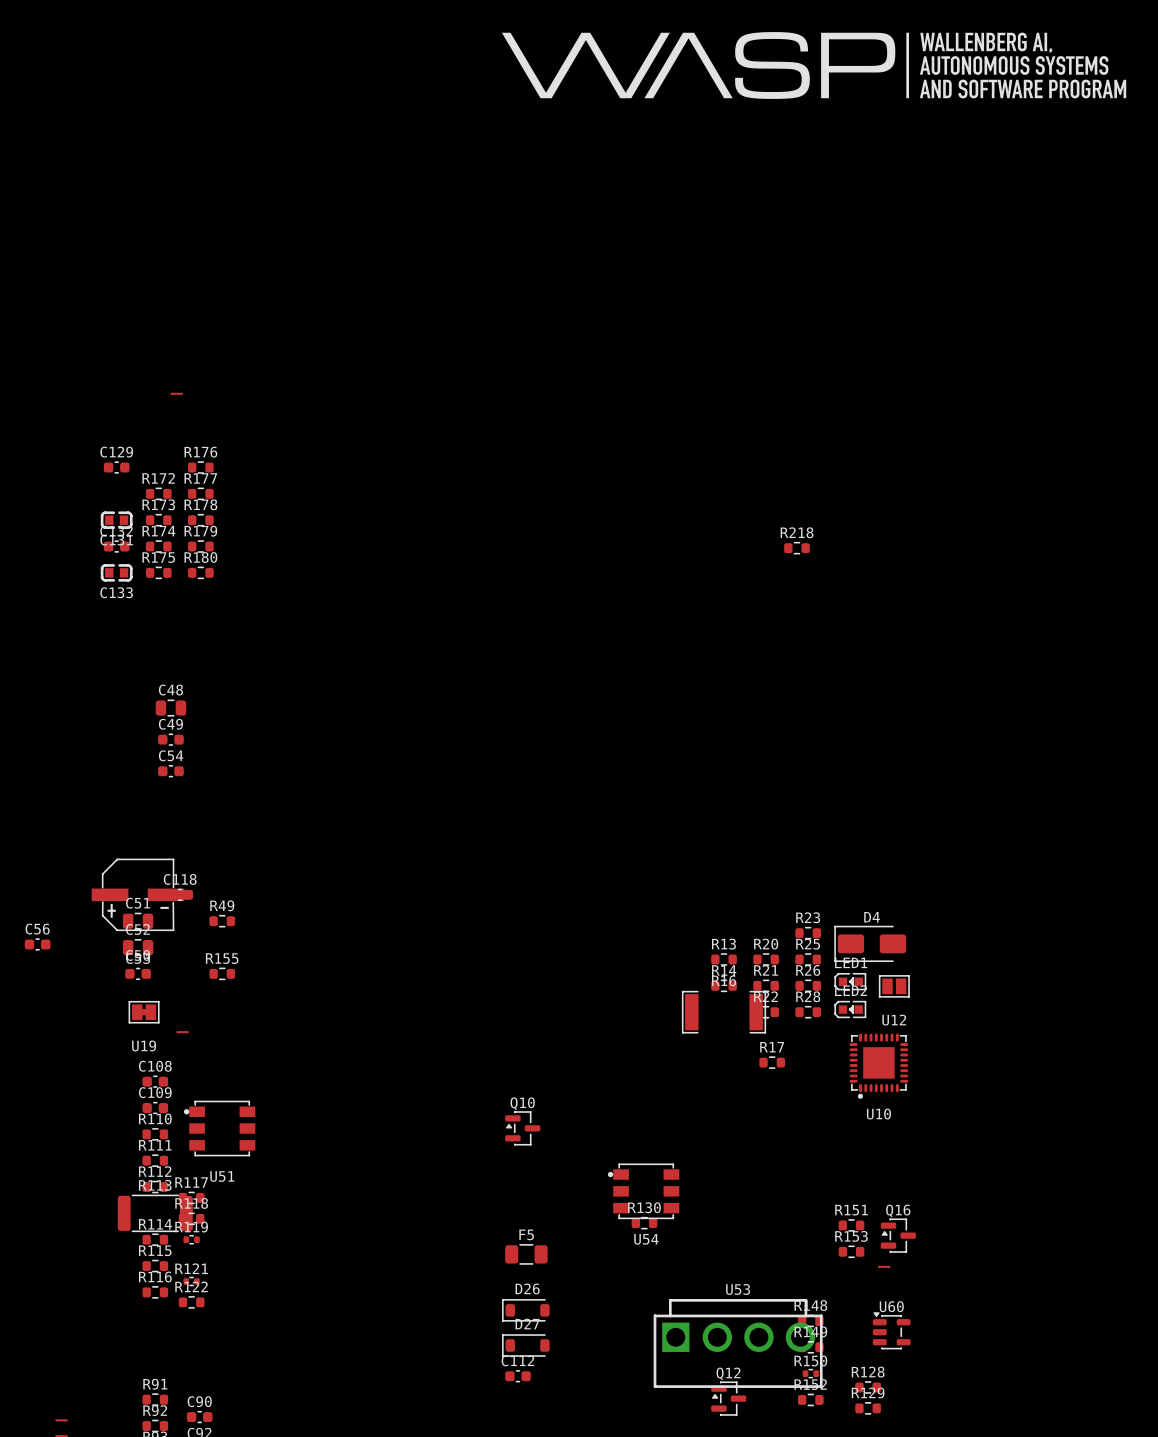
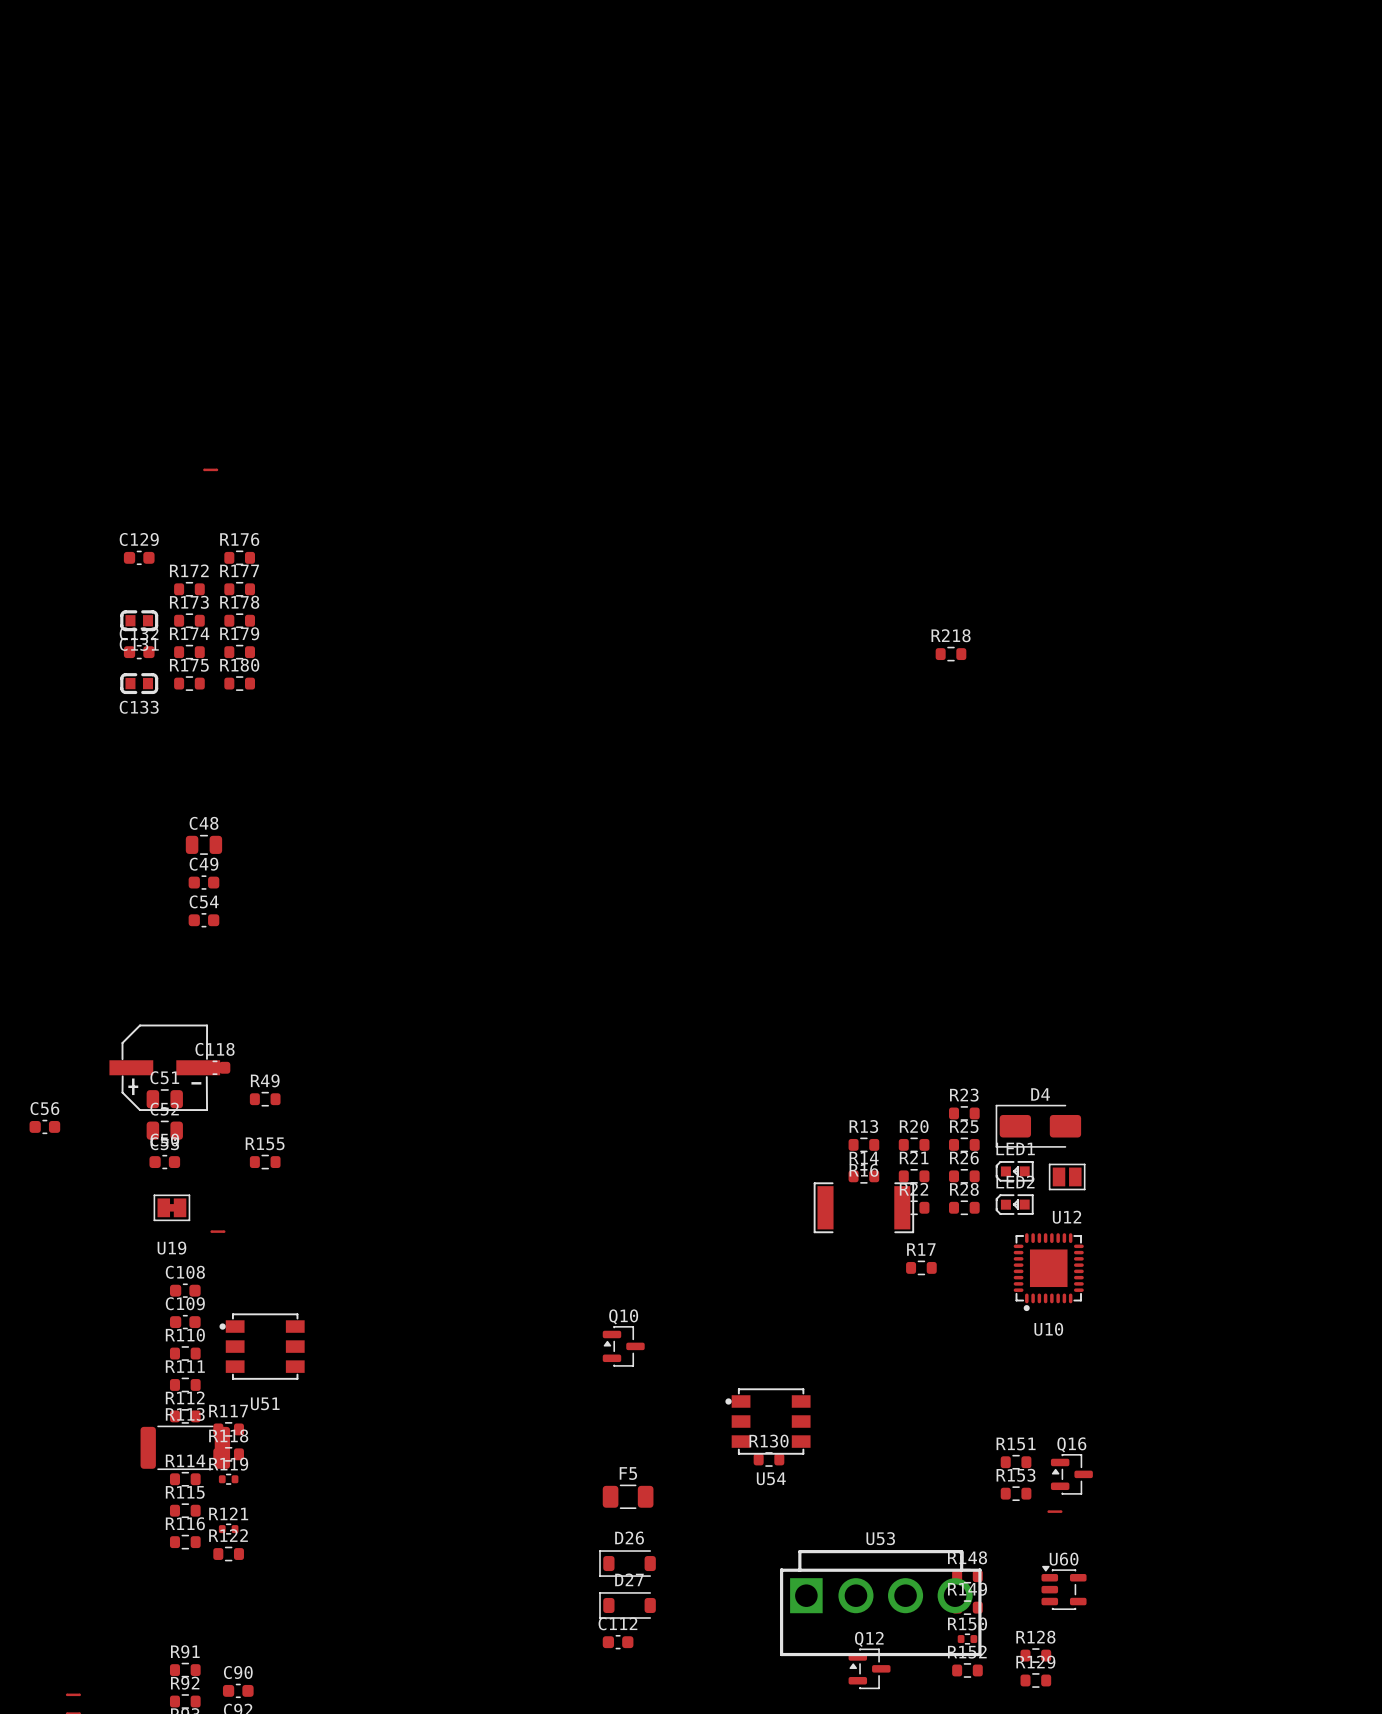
drawing: [501, 32, 1127, 99] -> none

